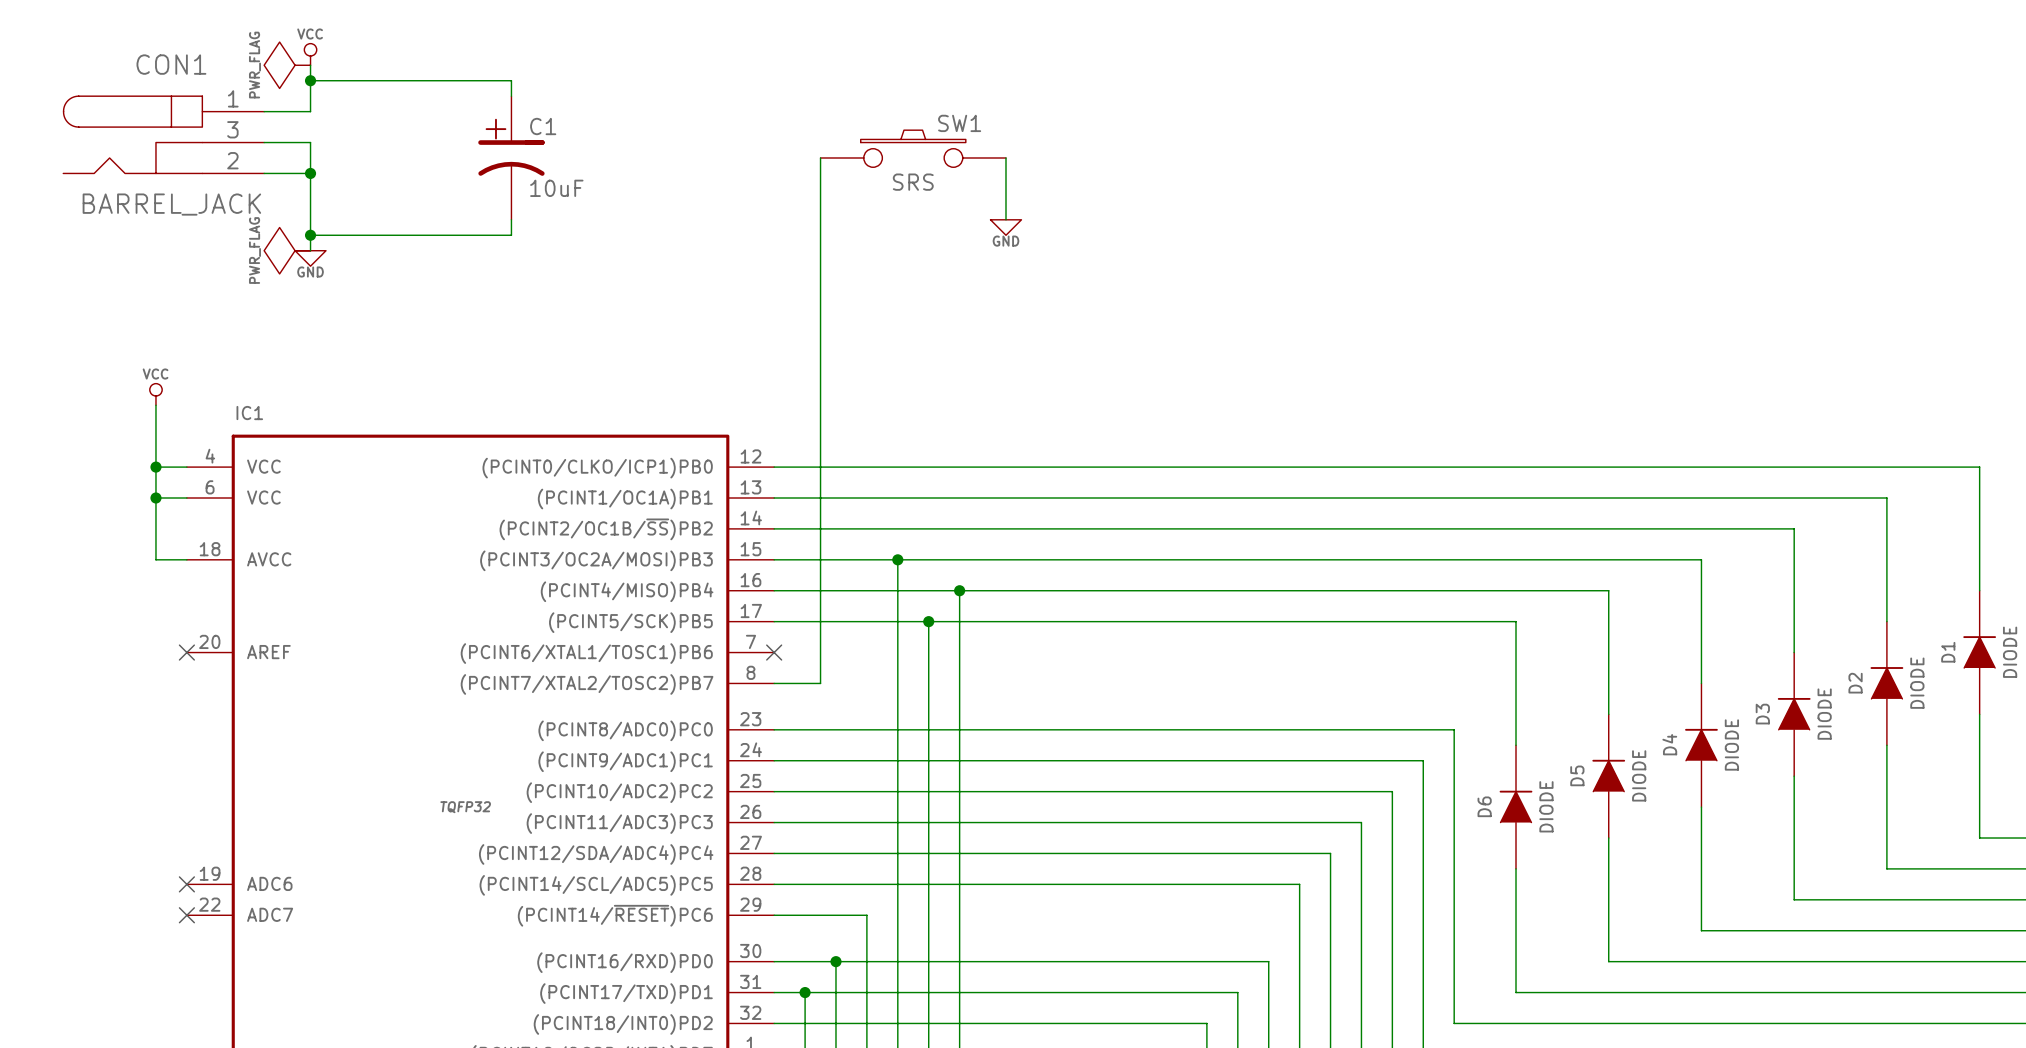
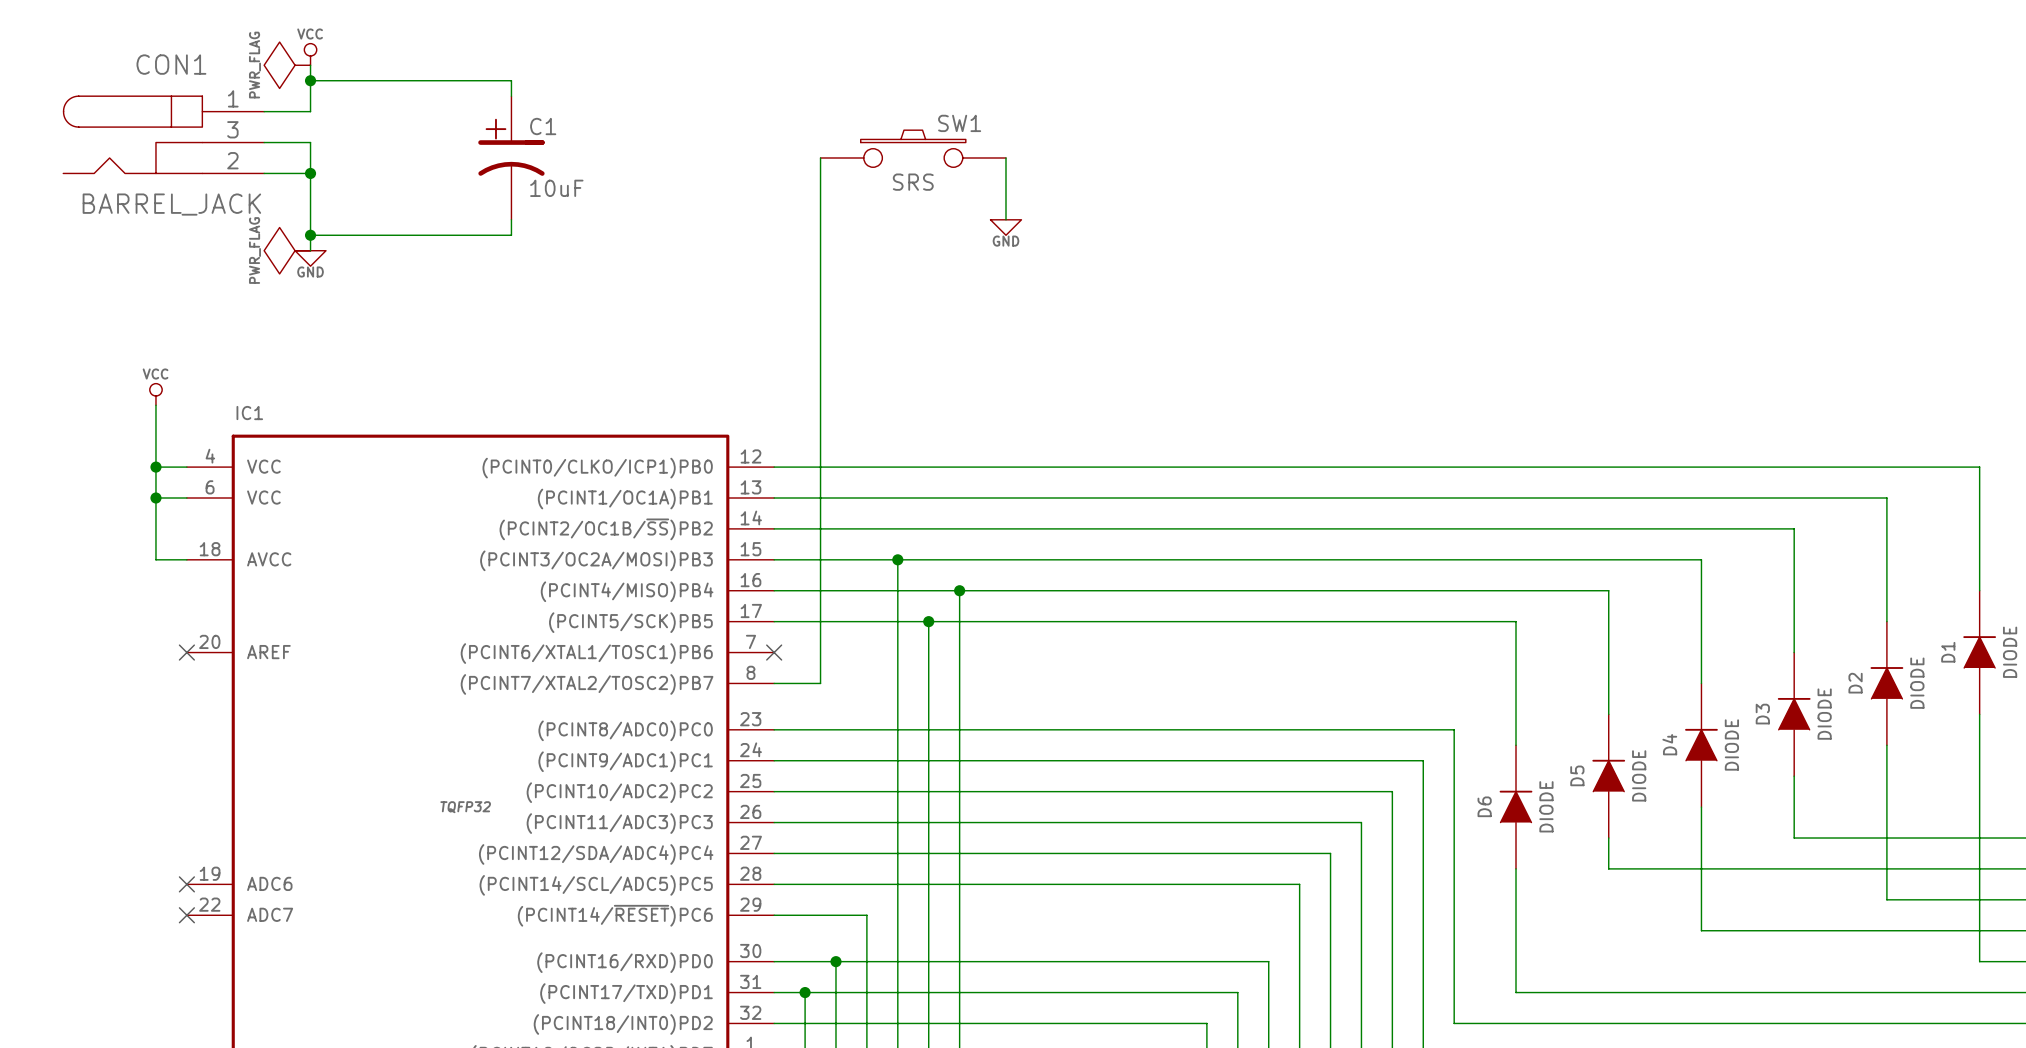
wire: (1794, 838) (1794, 899) (1886, 899) -> (1794, 838) (1979, 838) (1979, 961)
wire: (1608, 868) (1608, 961) (1979, 961) -> (1608, 868) (1886, 868) (1886, 899)

